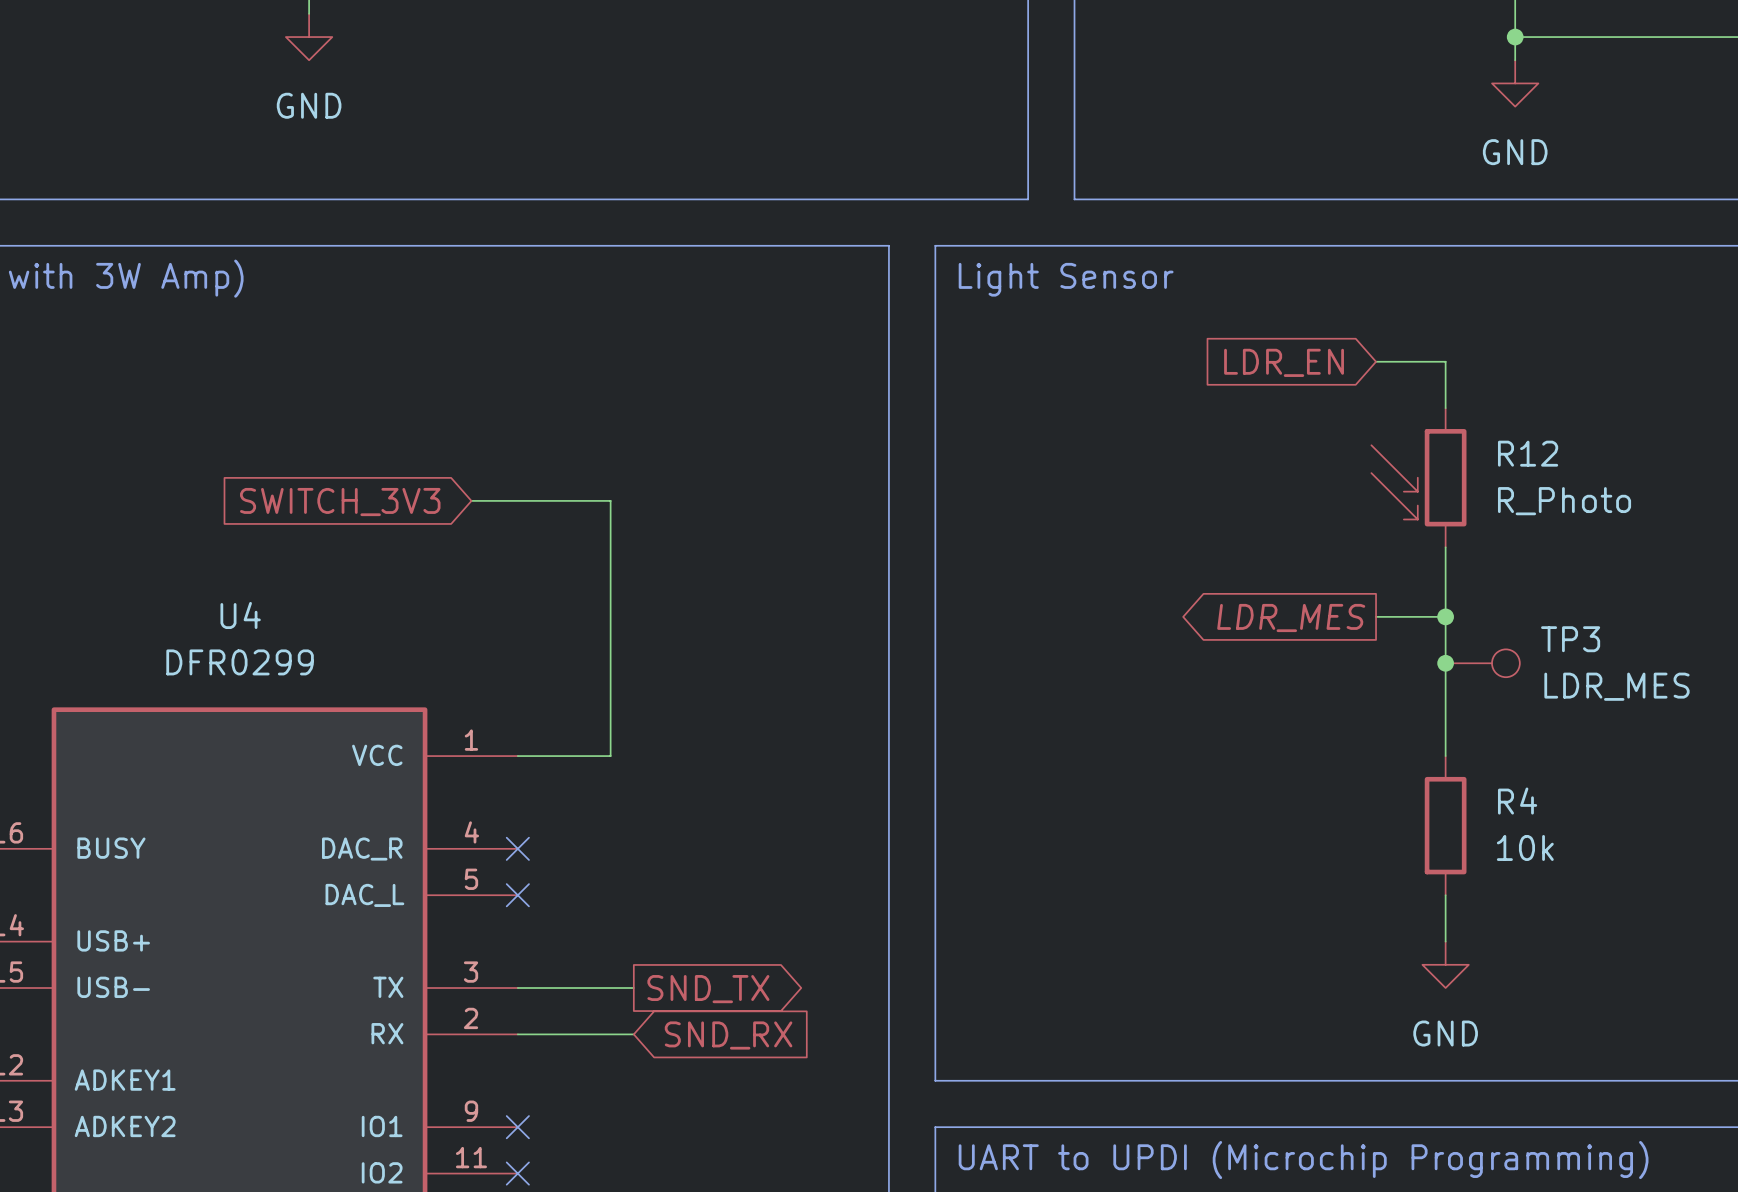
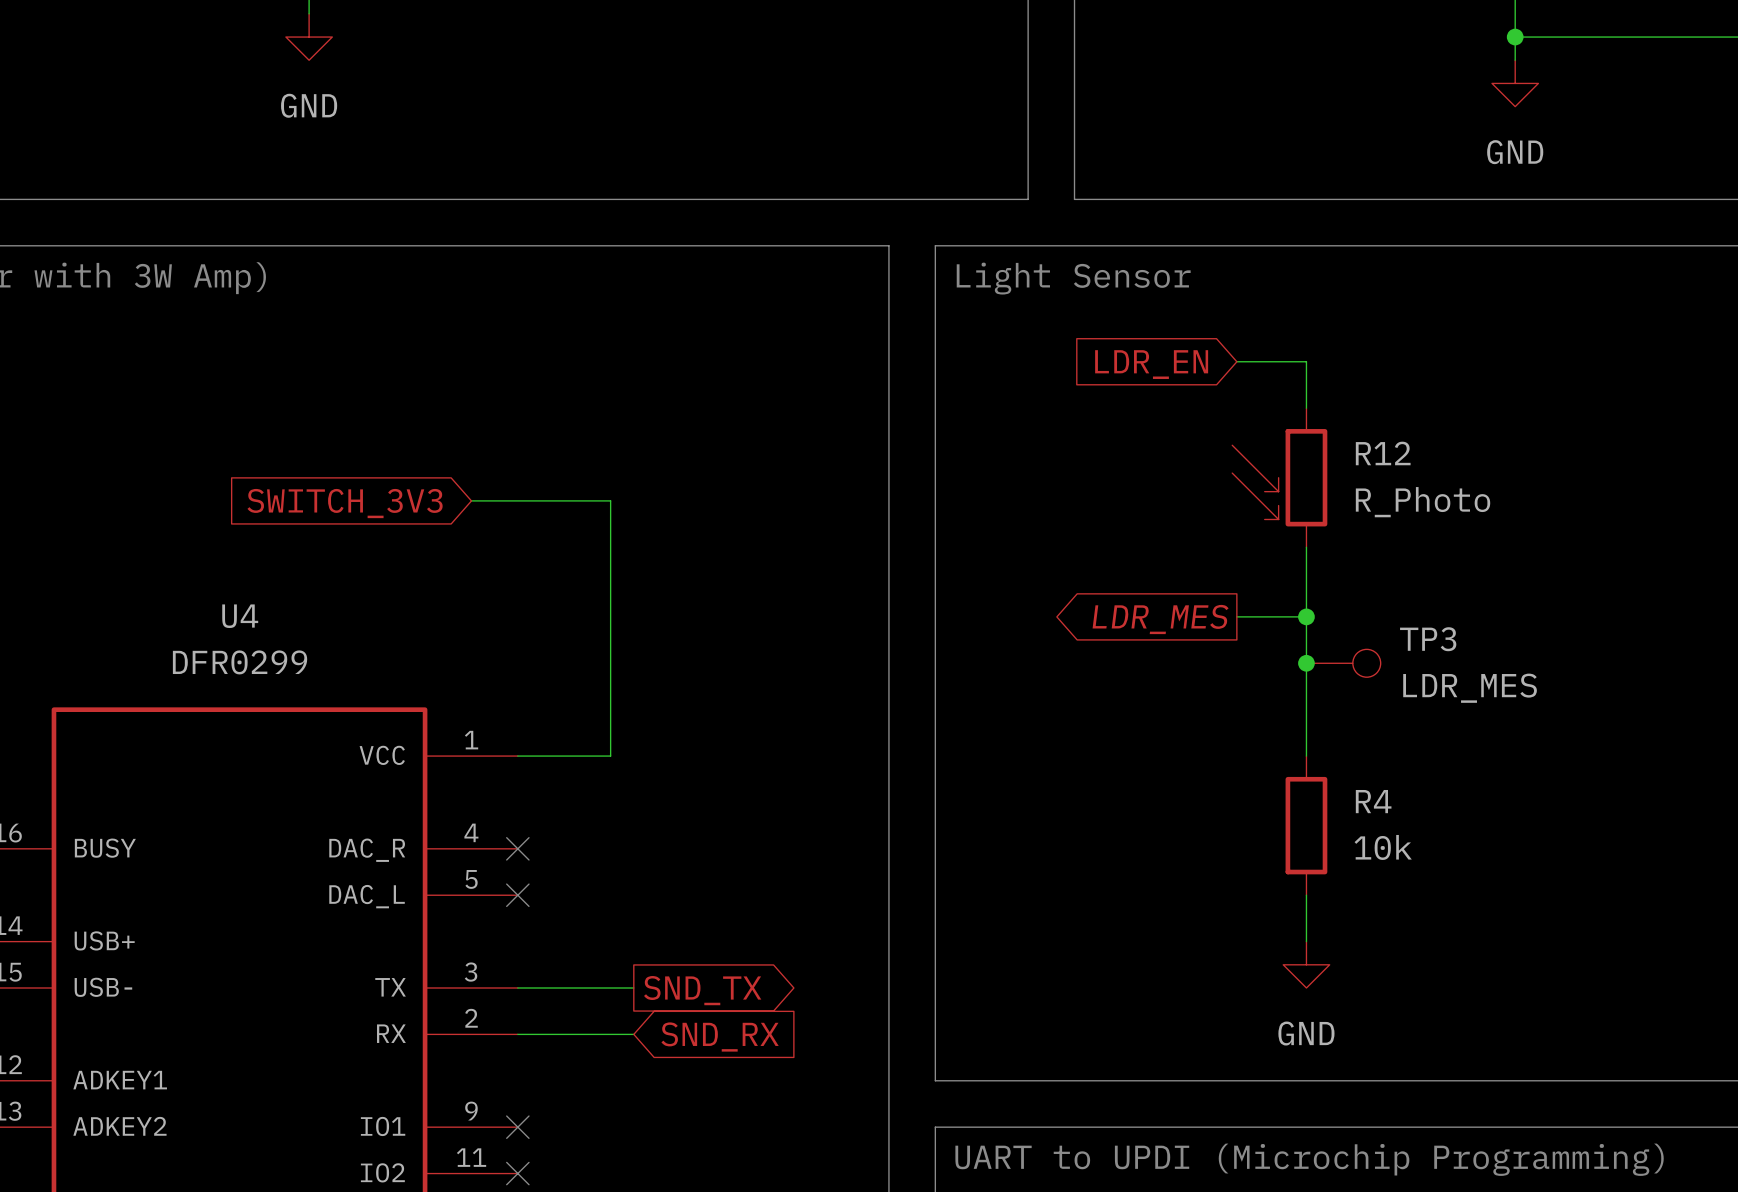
wire: (1376, 361) (1445, 361) (1445, 408) -> (1236, 361) (1306, 361) (1306, 408)
global label position: LDR_EN (1284, 362) -> LDR_EN (1151, 364)
R12 position: (1418, 477) -> (1279, 477)
wire: (1445, 547) (1445, 756) -> (1306, 547) (1306, 756)
junction: none -> (1306, 616)
wire: (1376, 616) (1445, 616) -> (1236, 616) (1306, 616)
junction: (1445, 616) -> none
global label position: LDR_MES (1291, 618) -> LDR_MES (1160, 619)
junction: none -> (1306, 663)
junction: (1445, 663) -> none
TP3 position: (1482, 663) -> (1343, 663)
R4 position: (1445, 825) -> (1306, 825)
wire: (1445, 895) (1445, 941) -> (1306, 895) (1306, 941)
power symbol position: GND (1445, 964) -> GND (1306, 964)

